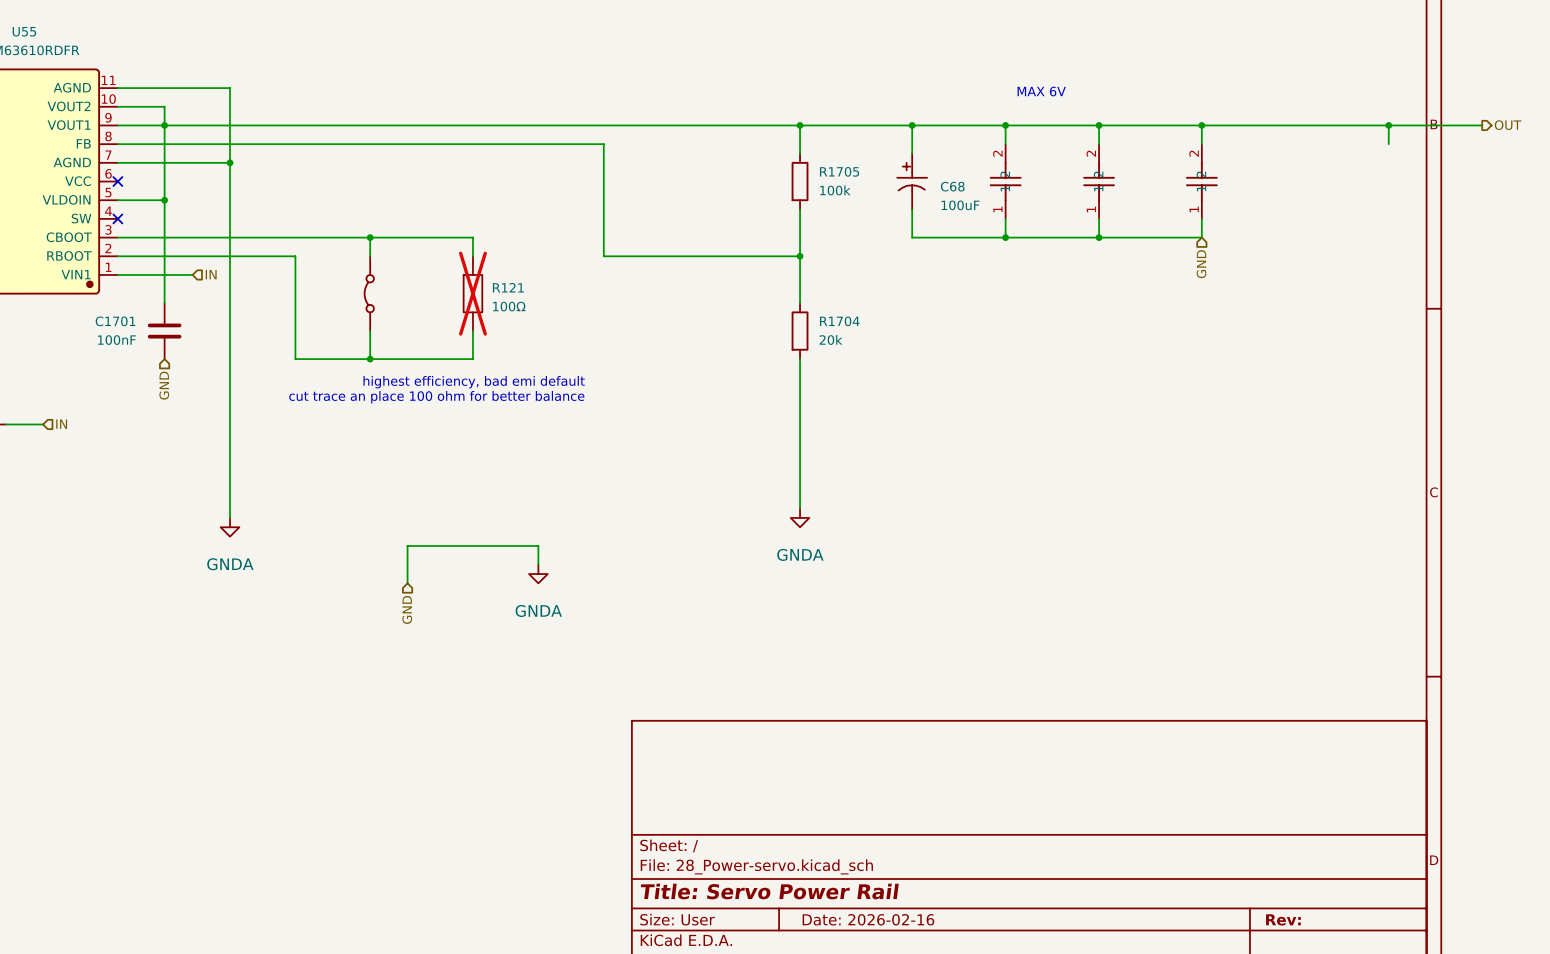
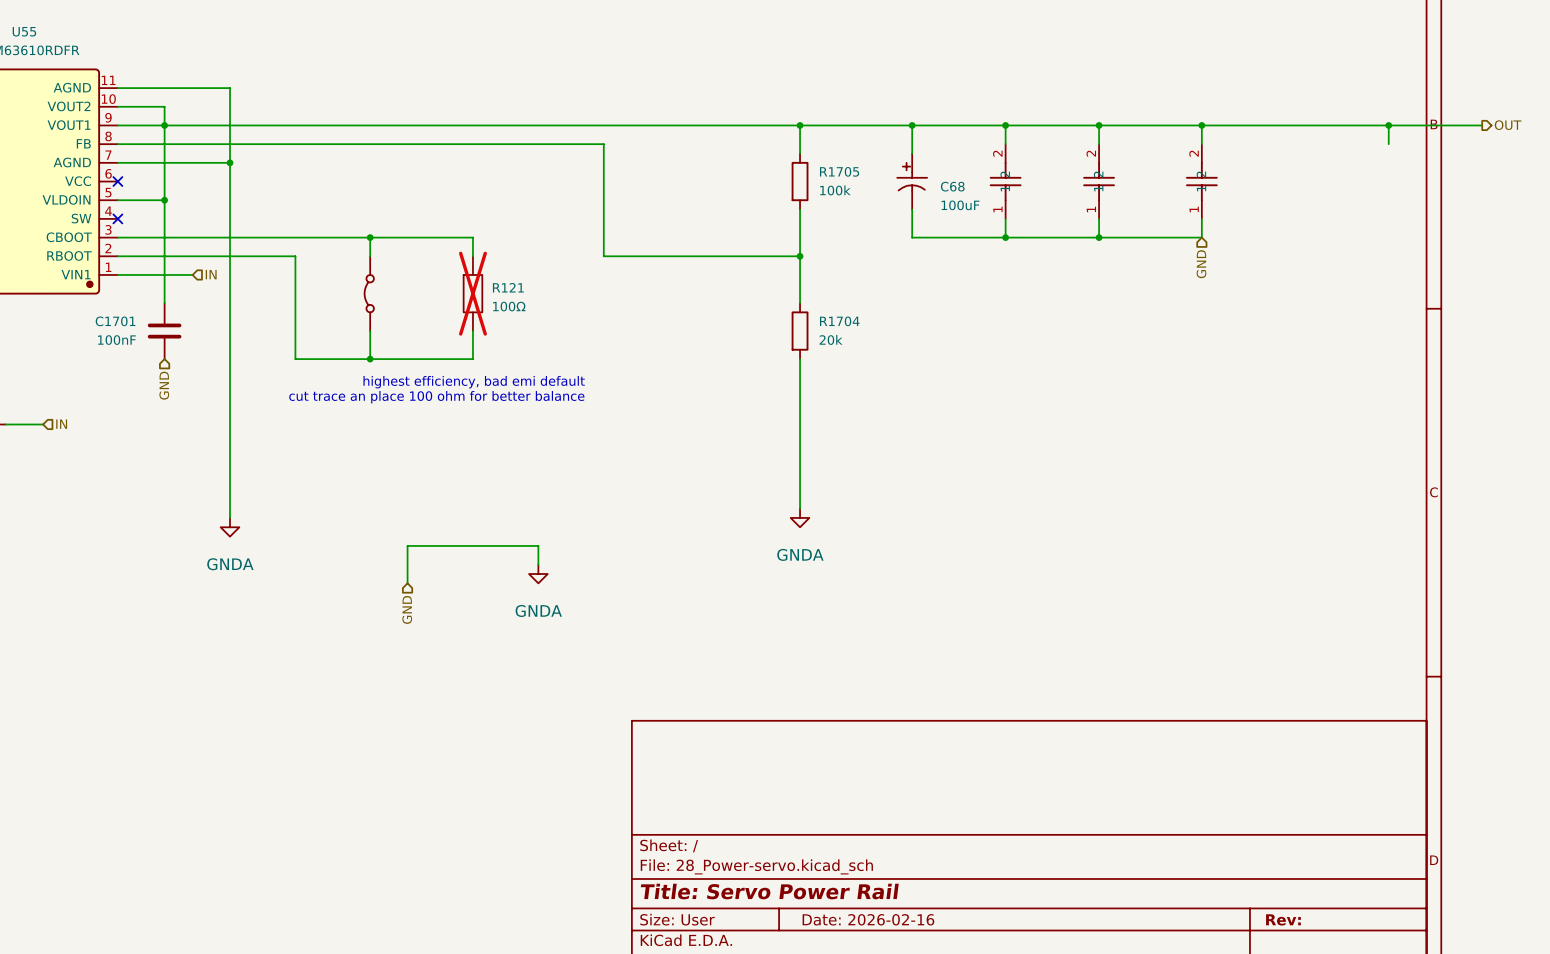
text: MAX 6V (1041, 91) -> none

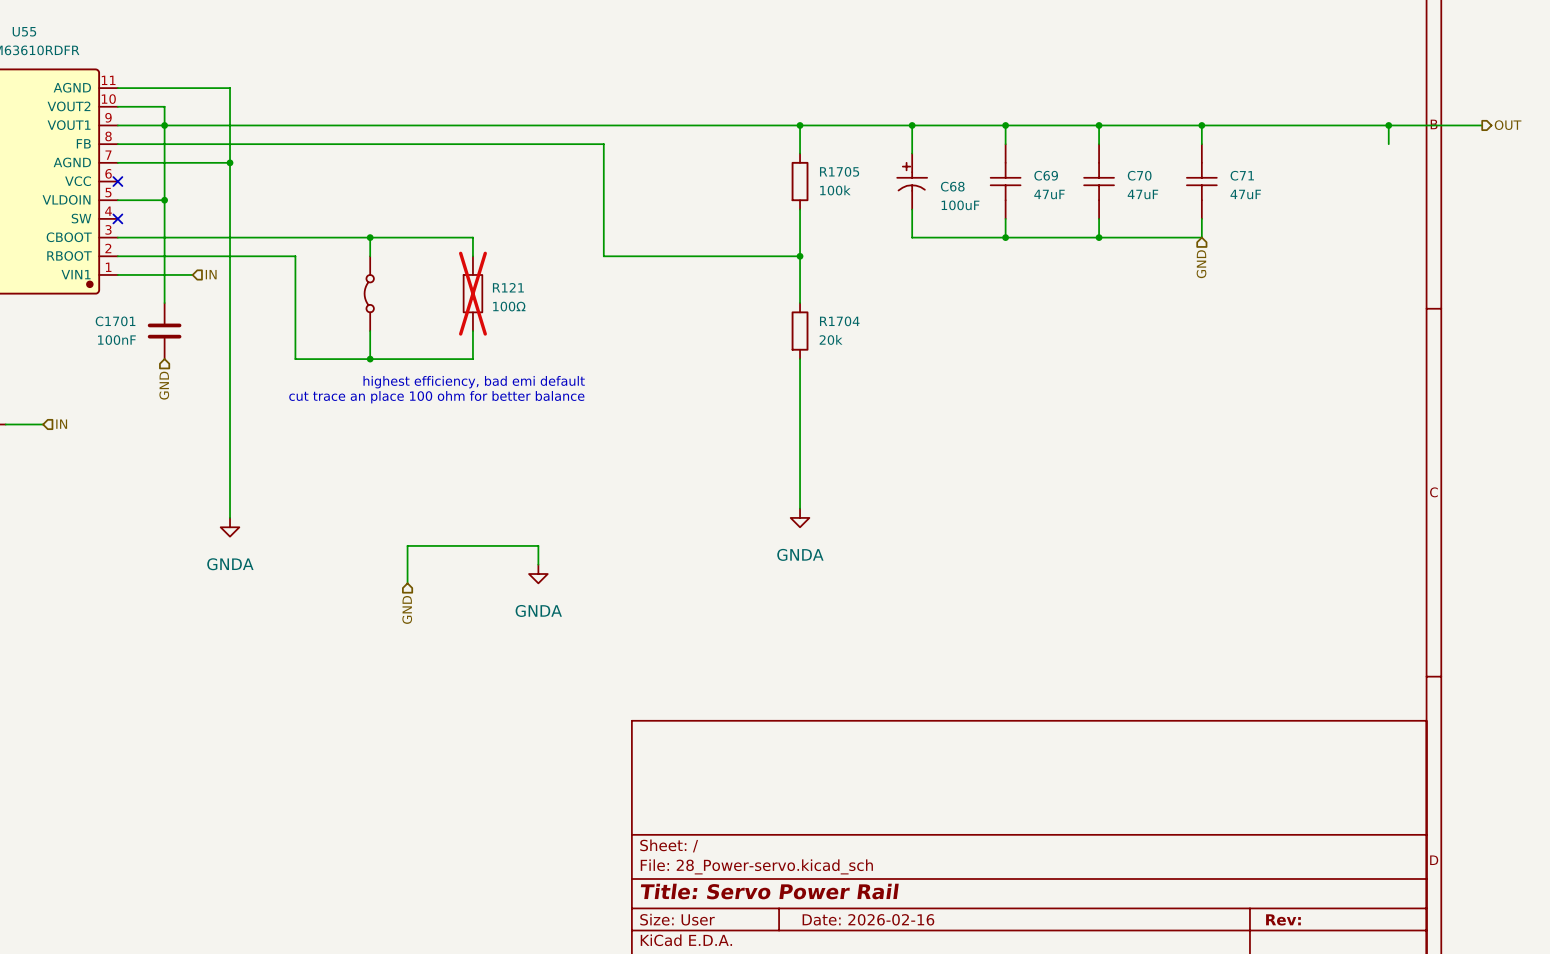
part: (1005, 181) -> none
C69: none -> 47uF (1005, 181)
part: (1099, 181) -> none
C70: none -> 47uF (1099, 181)
part: (1201, 181) -> none
C71: none -> 47uF (1201, 181)

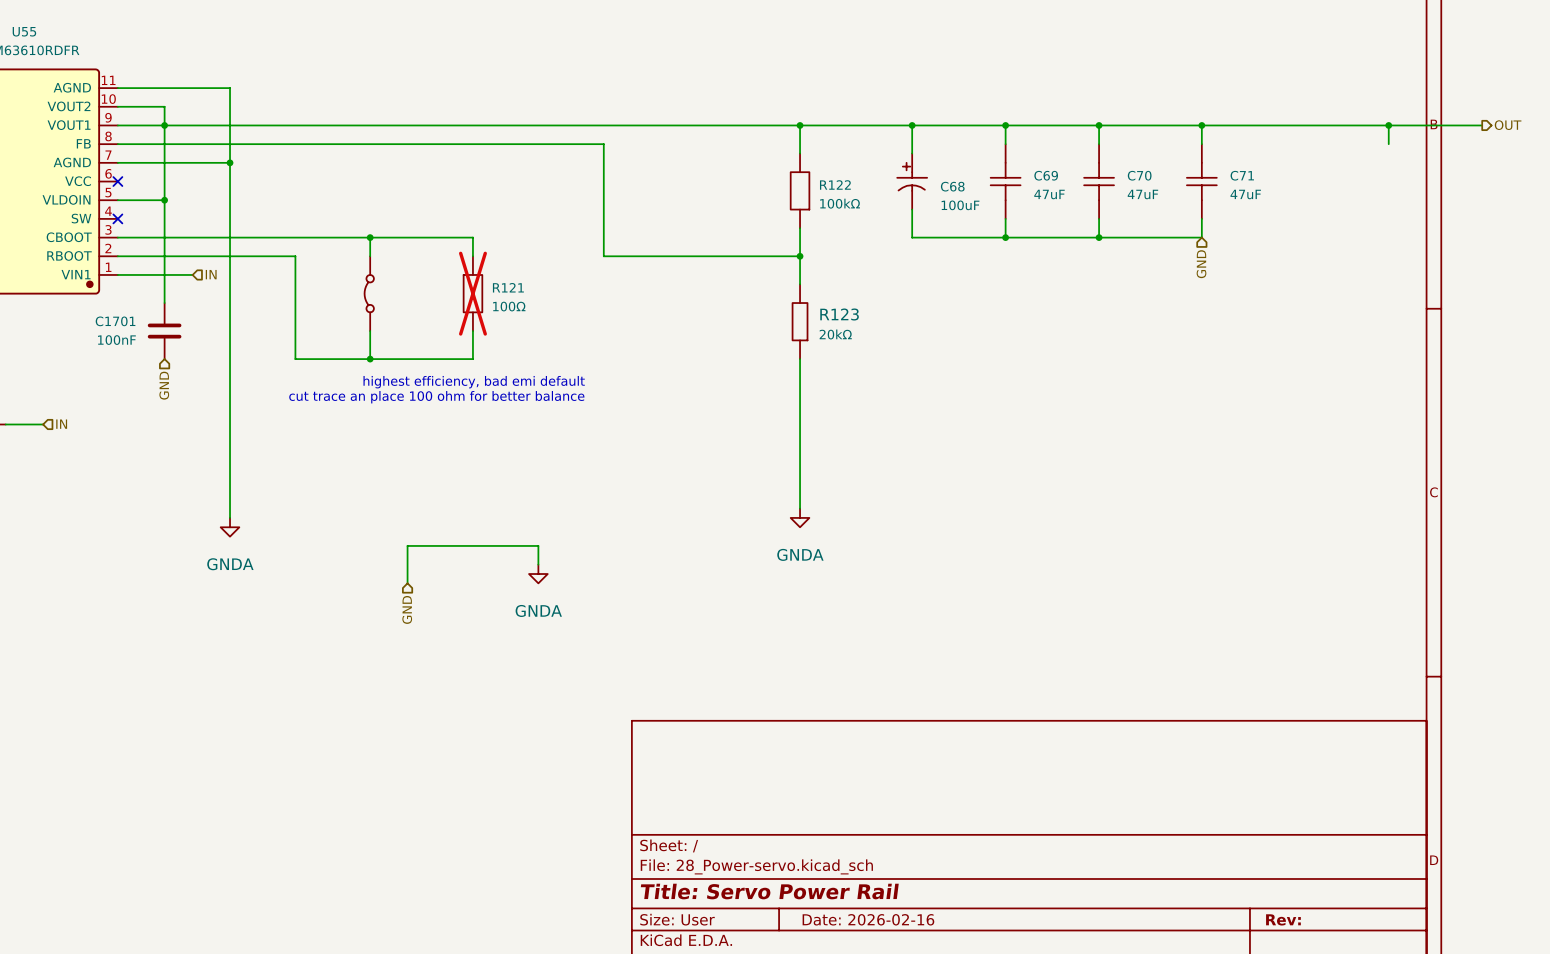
R1705: 100k (800, 181) -> none
R122: none -> 100kΩ (800, 190)
R123: none -> 20kΩ (800, 321)
R1704: 20k (800, 331) -> none

